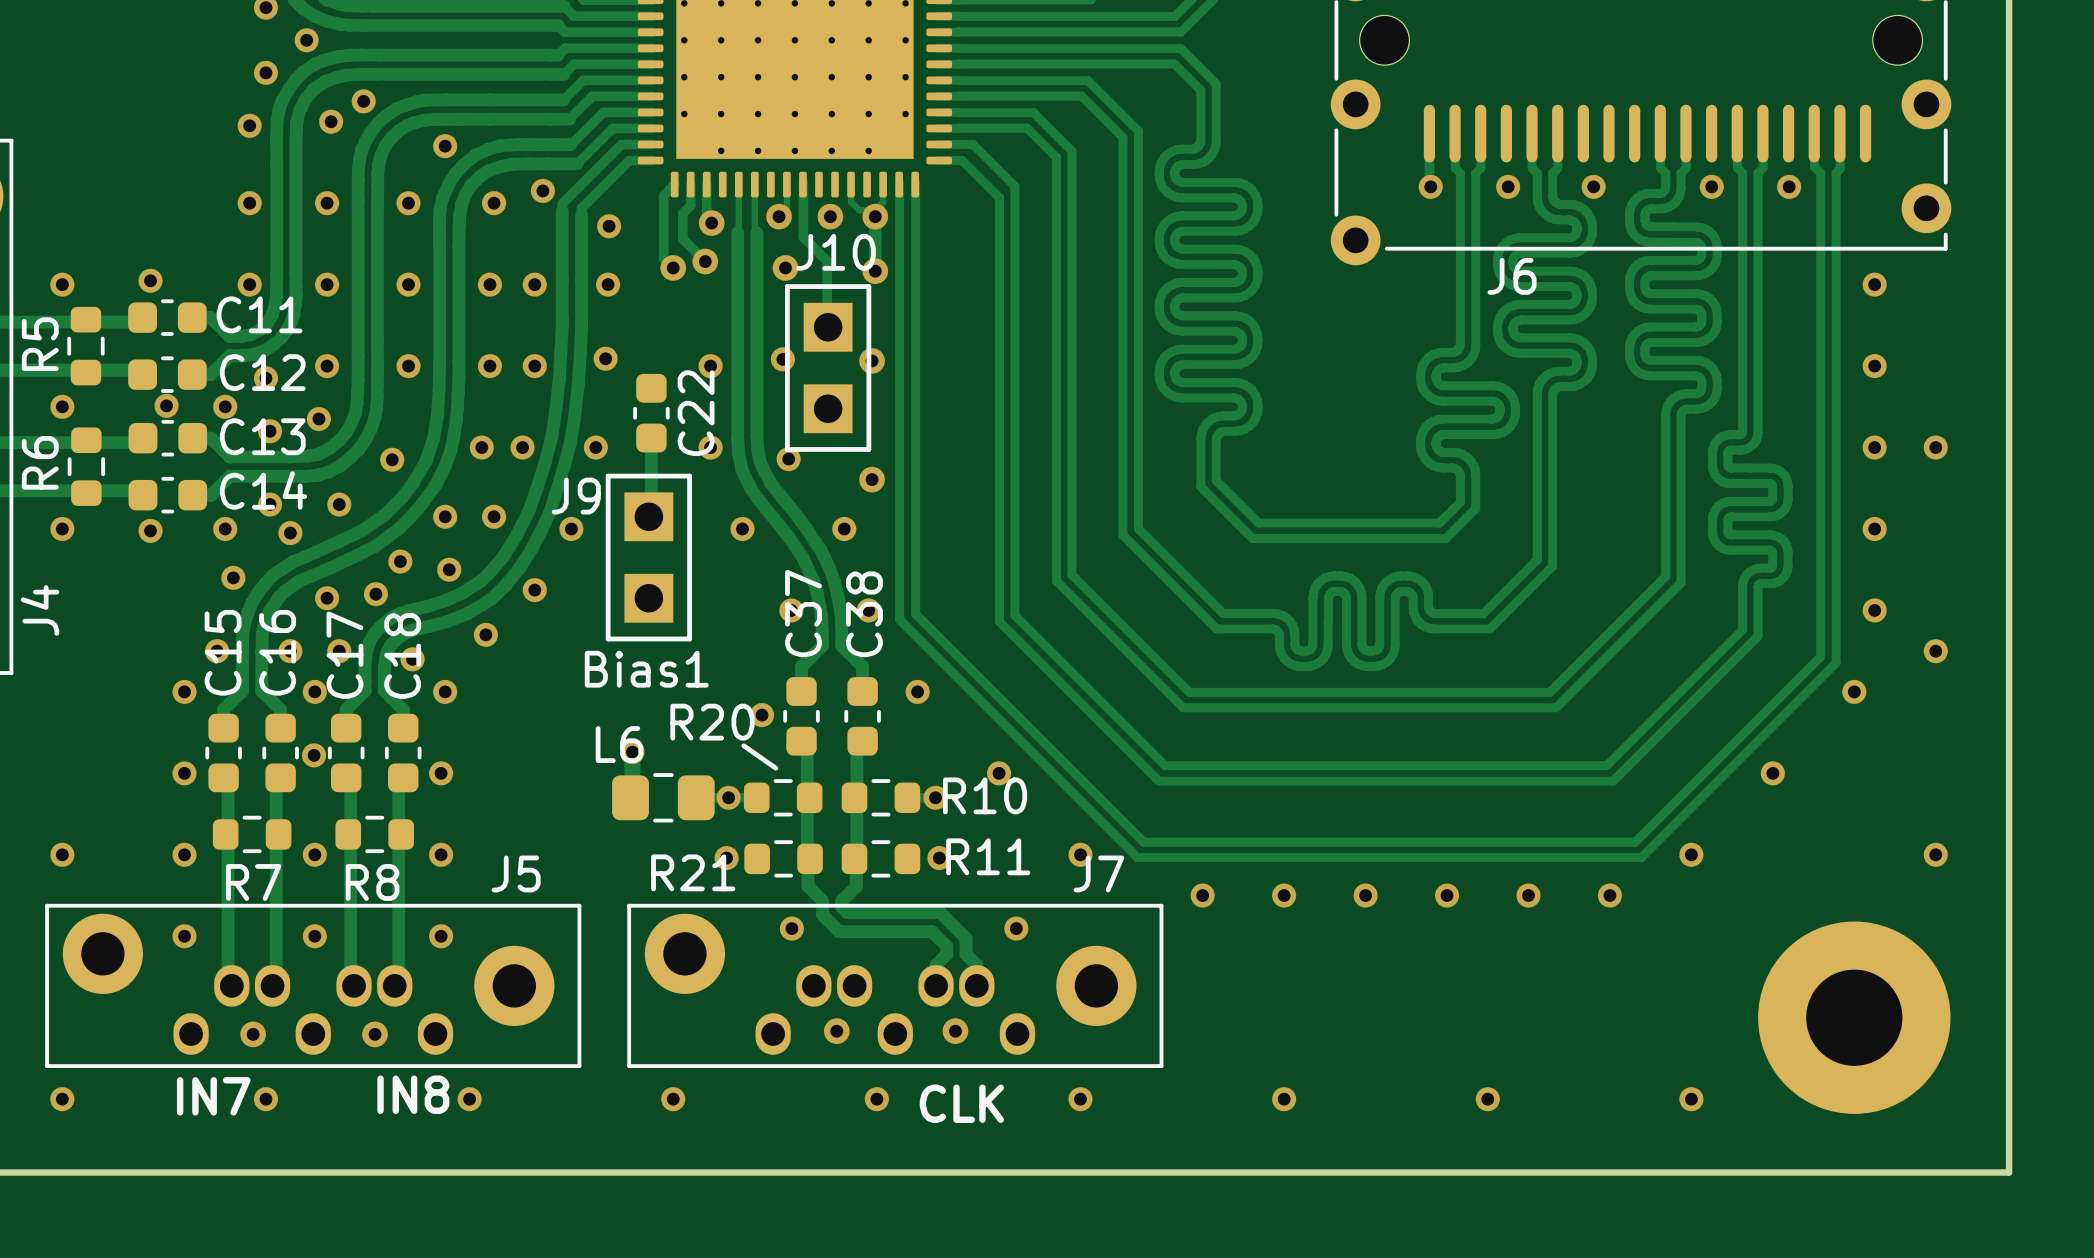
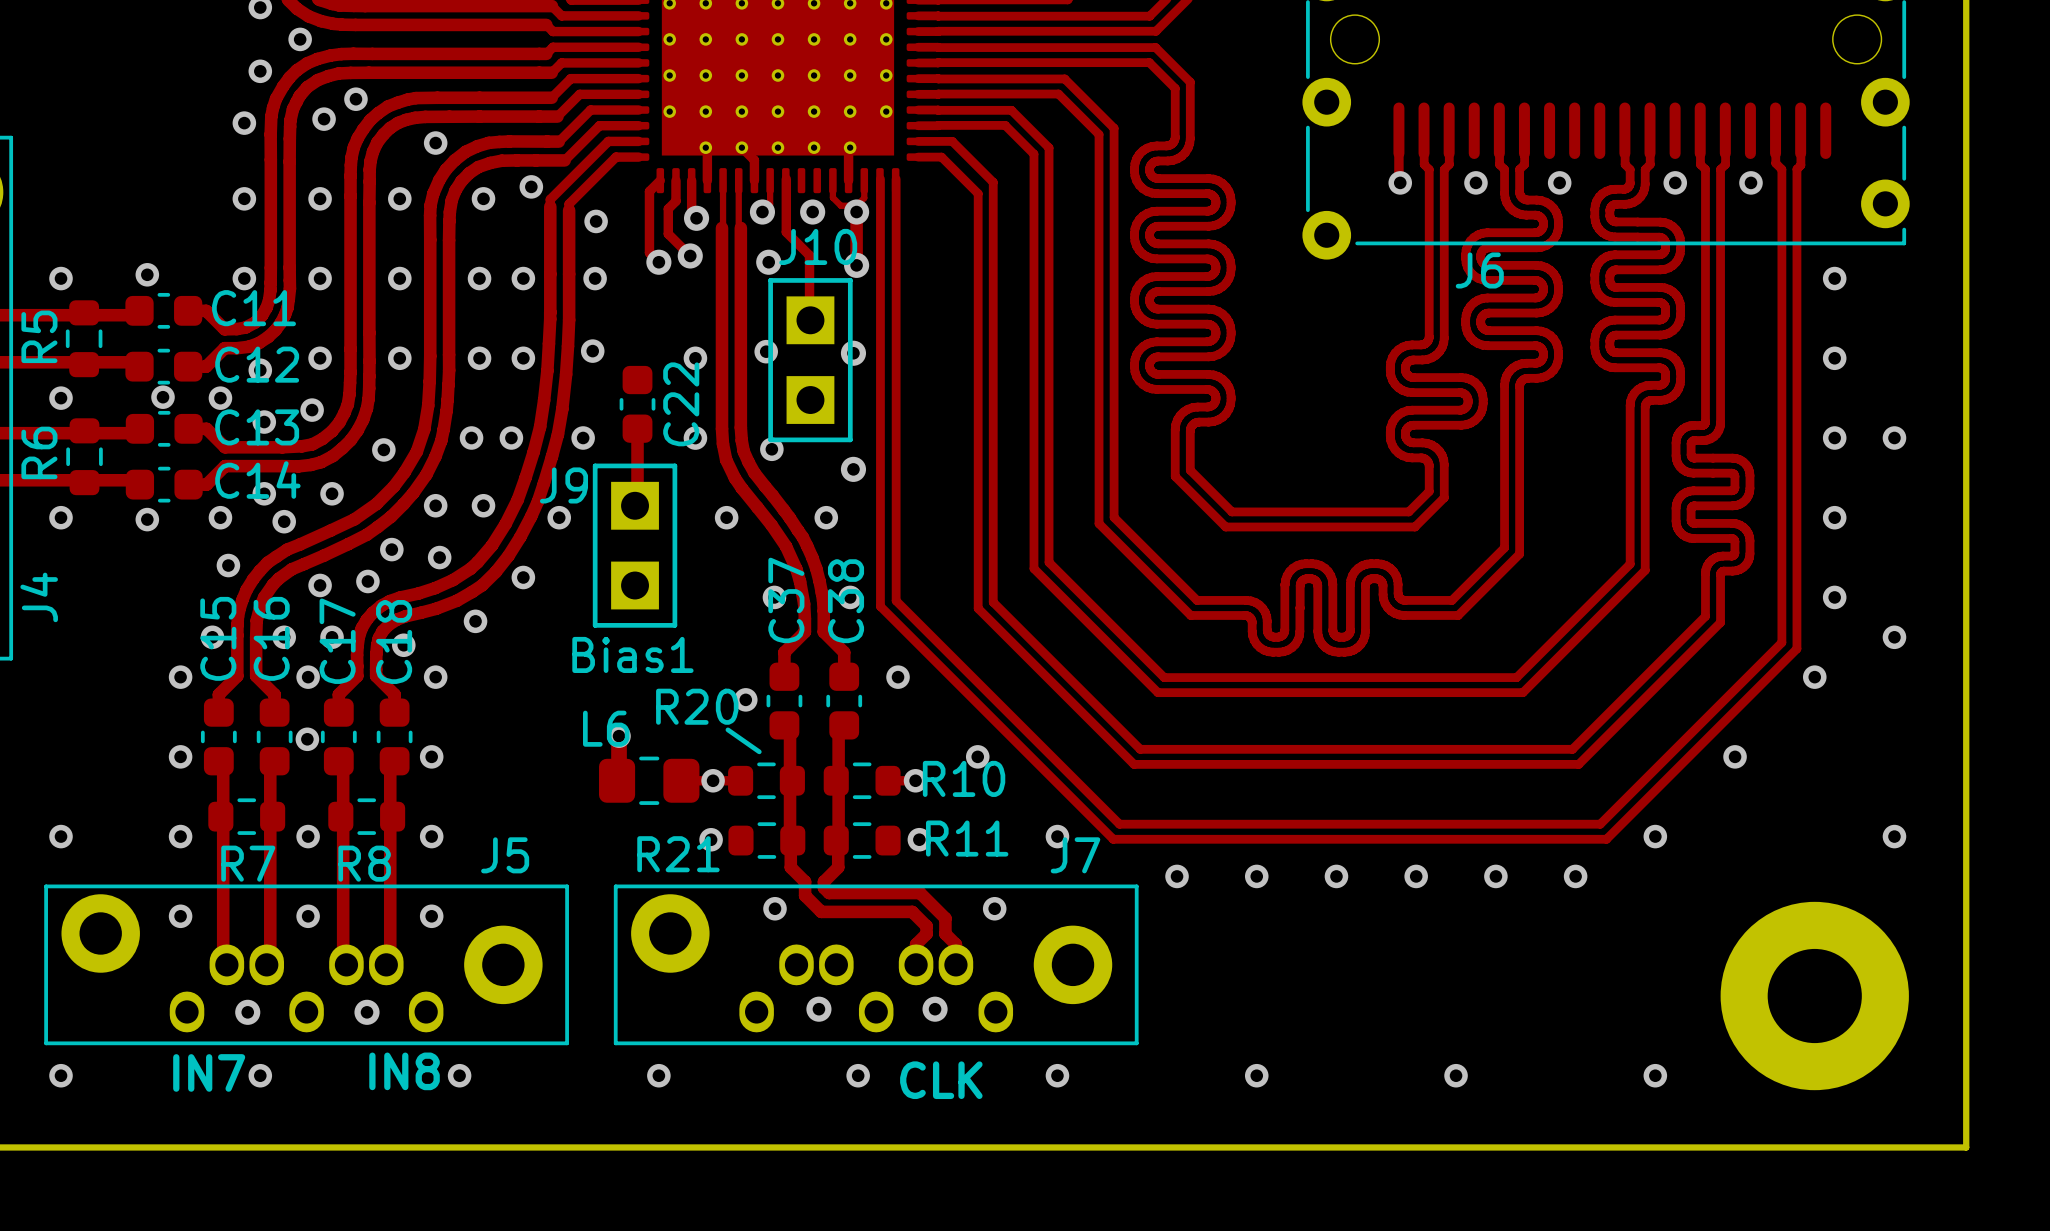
track: none -> (705, 147) (707, 180)
track: none -> (741, 147) (754, 160) (754, 180)
track: none -> (850, 147) (848, 180)

